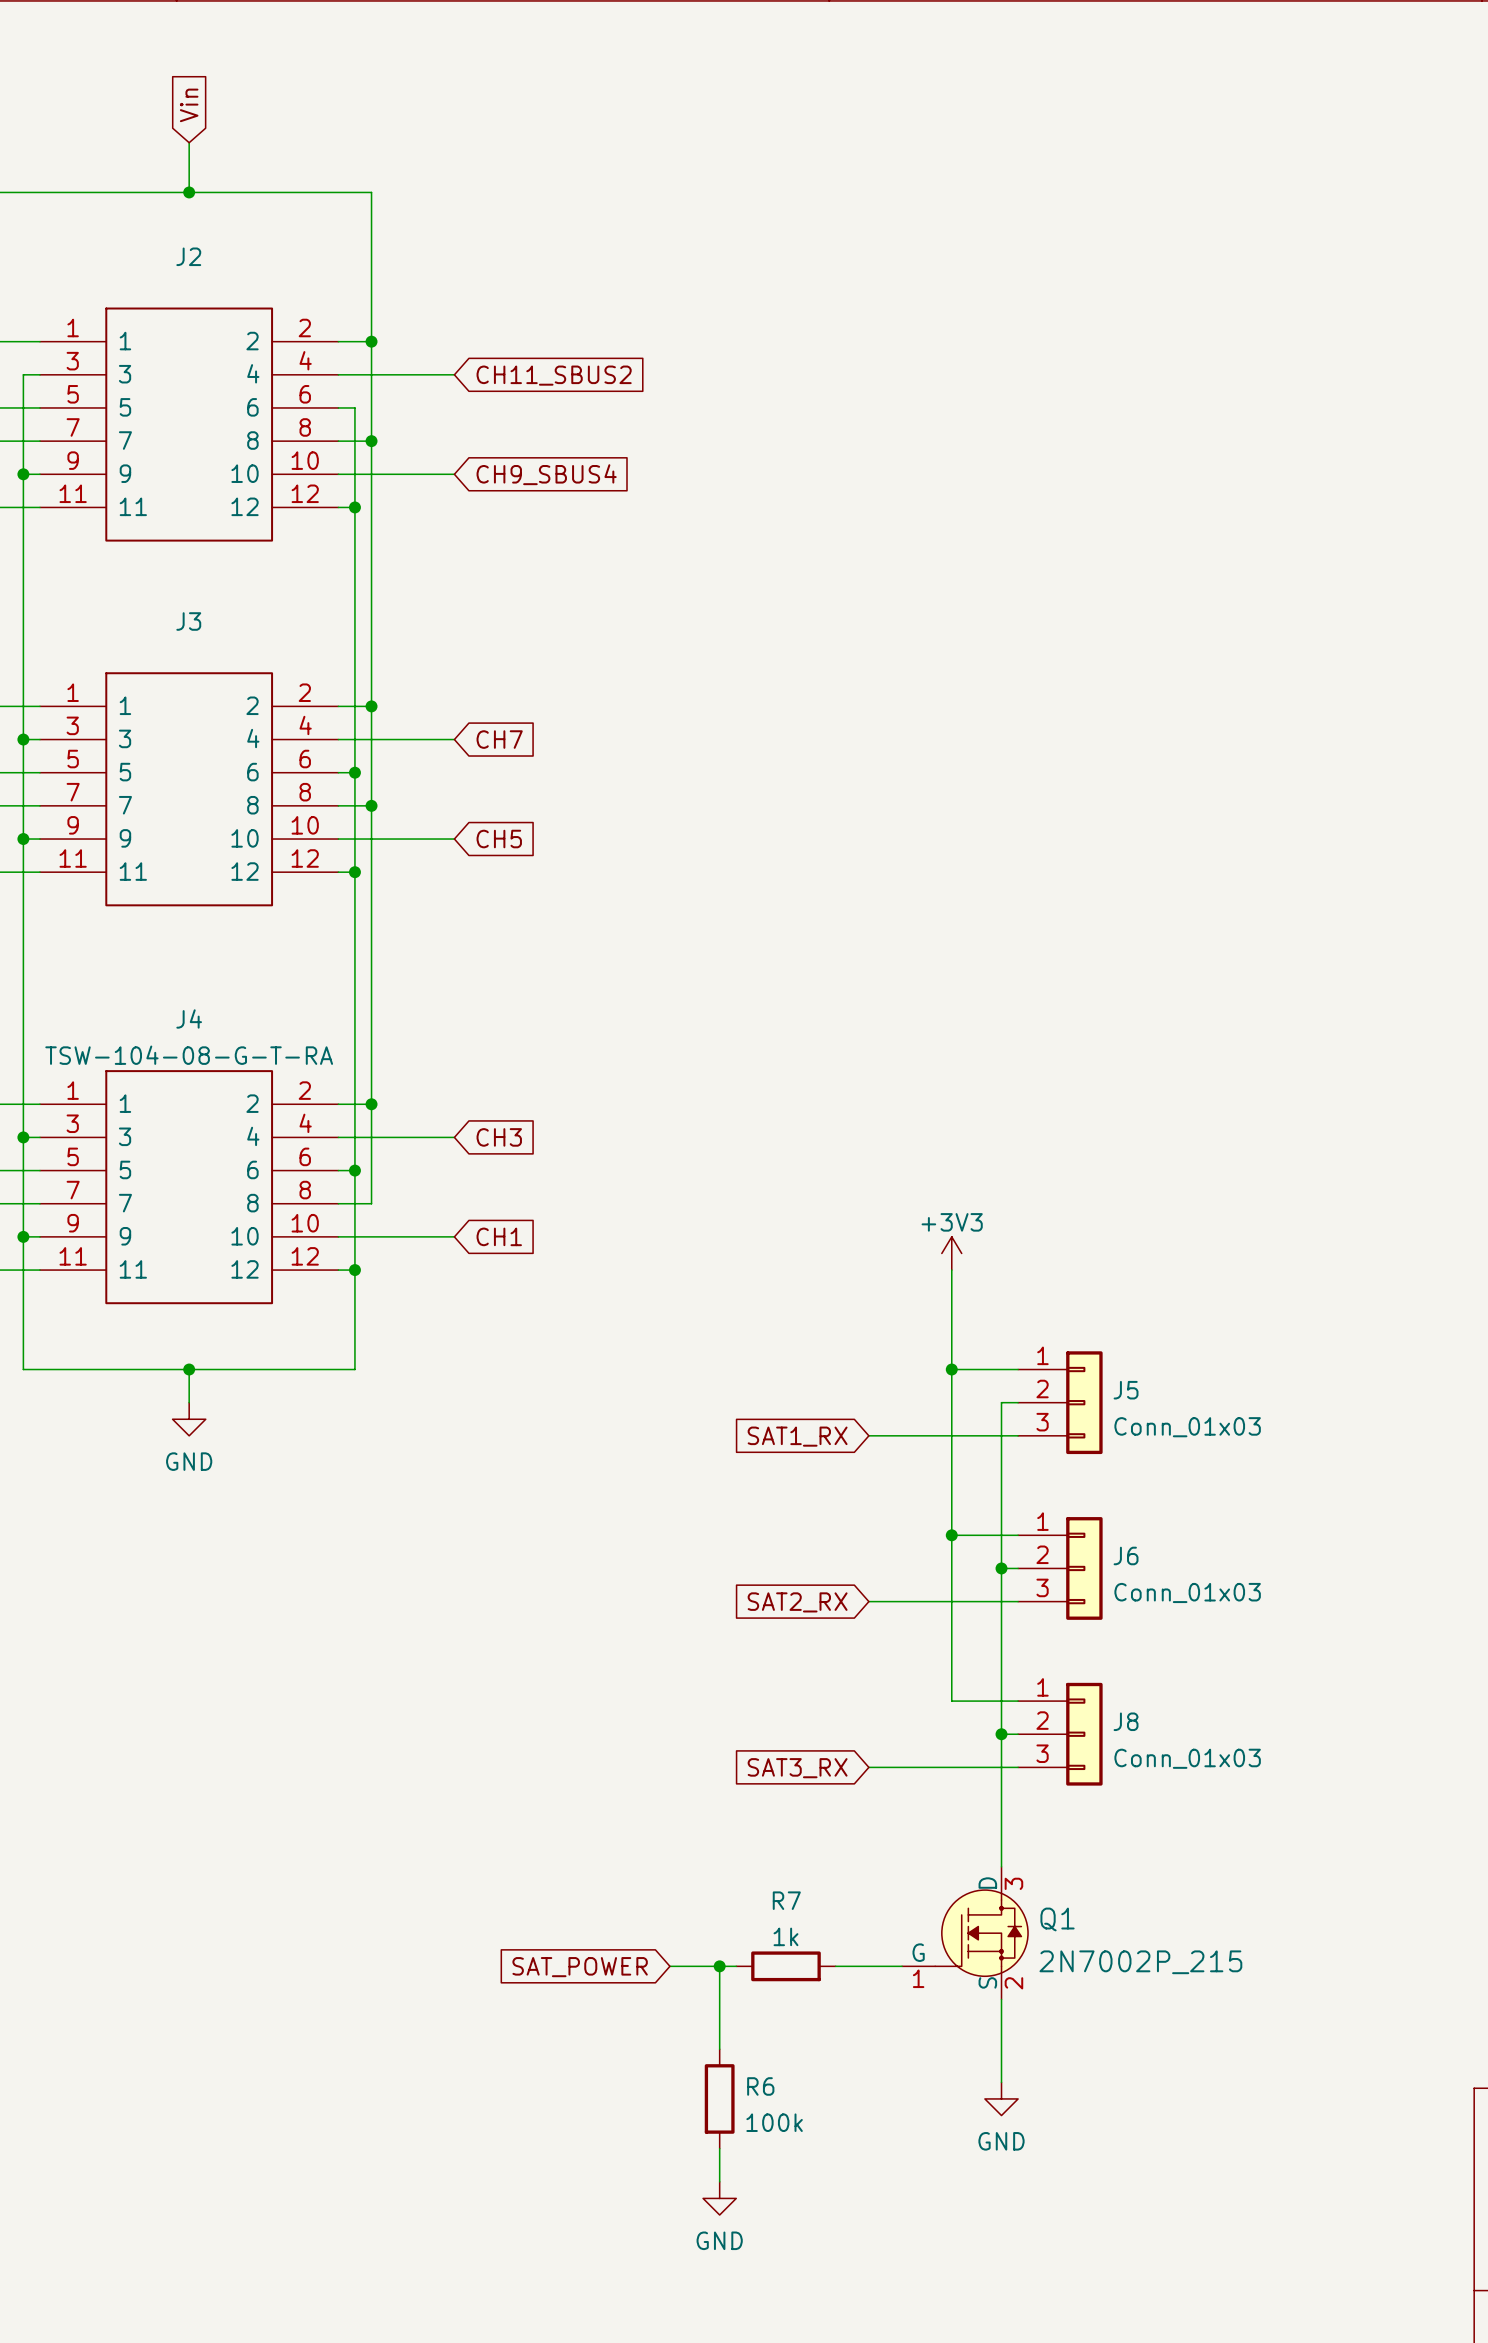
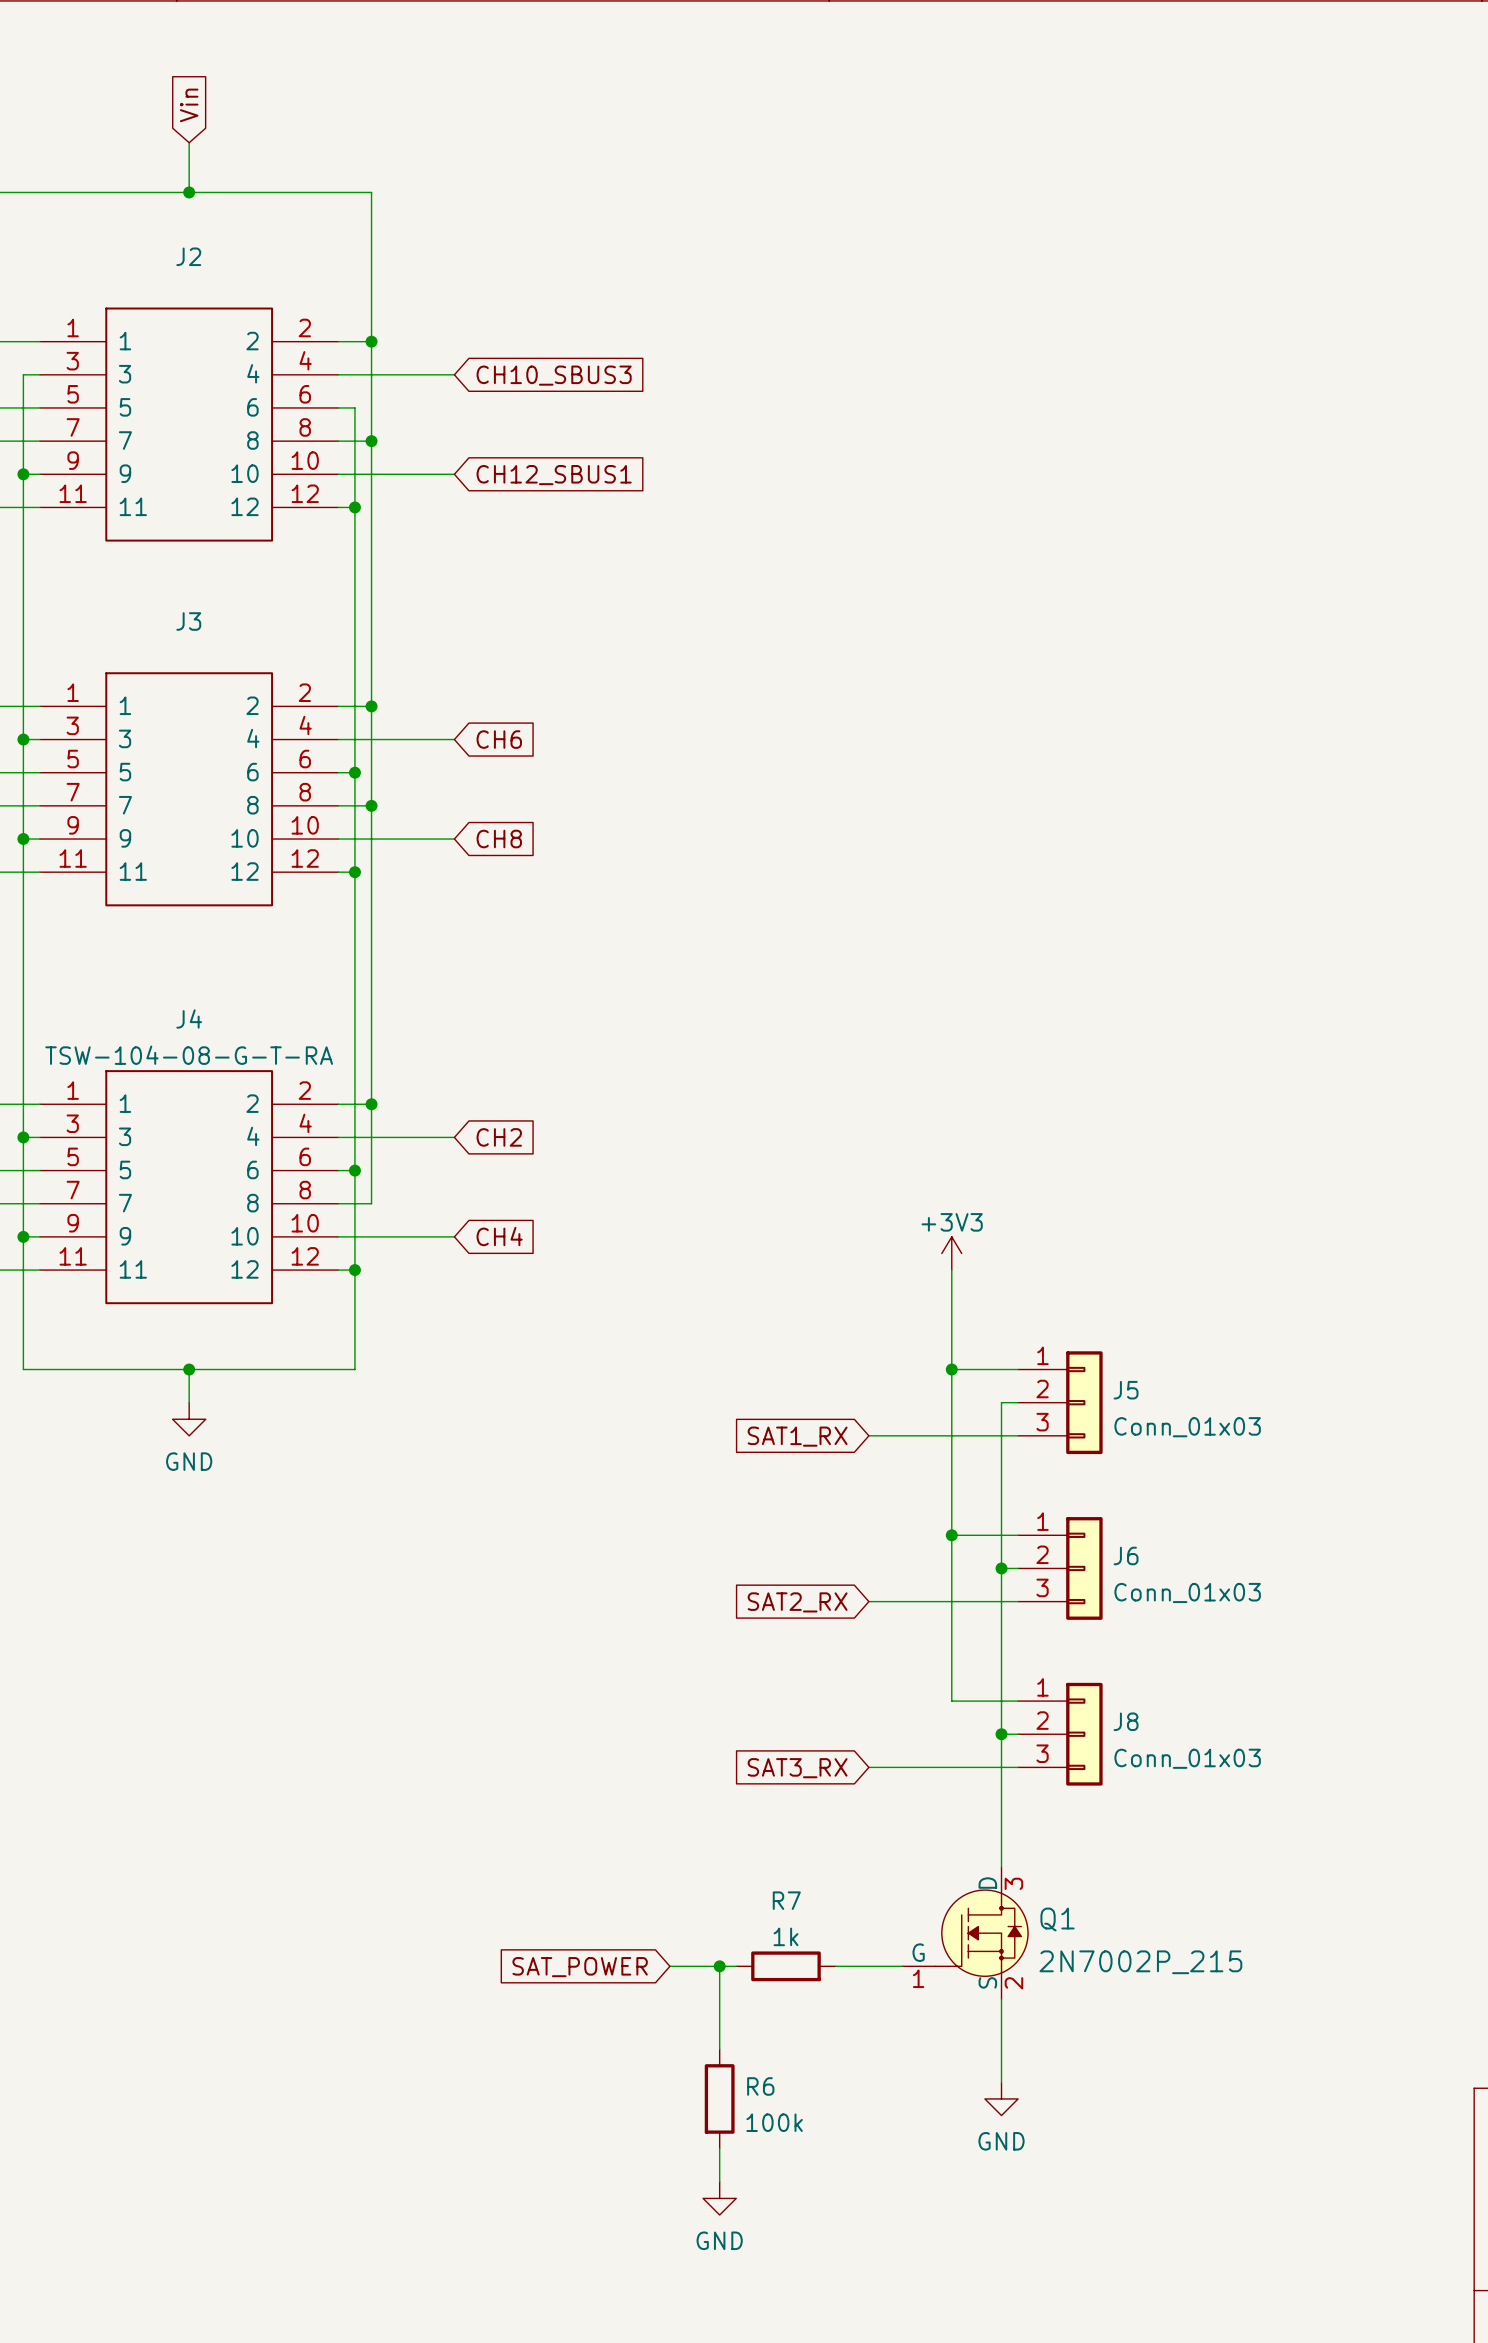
global label: CH11_SBUS2 (554, 375) -> CH10_SBUS3 (554, 375)
global label: CH9_SBUS4 (546, 474) -> CH12_SBUS1 (554, 475)
global label: CH7 (499, 739) -> CH6 (499, 739)
global label: CH5 (499, 839) -> CH8 (499, 839)
global label: CH3 (499, 1137) -> CH2 (499, 1137)
global label: CH1 (499, 1236) -> CH4 (499, 1236)

